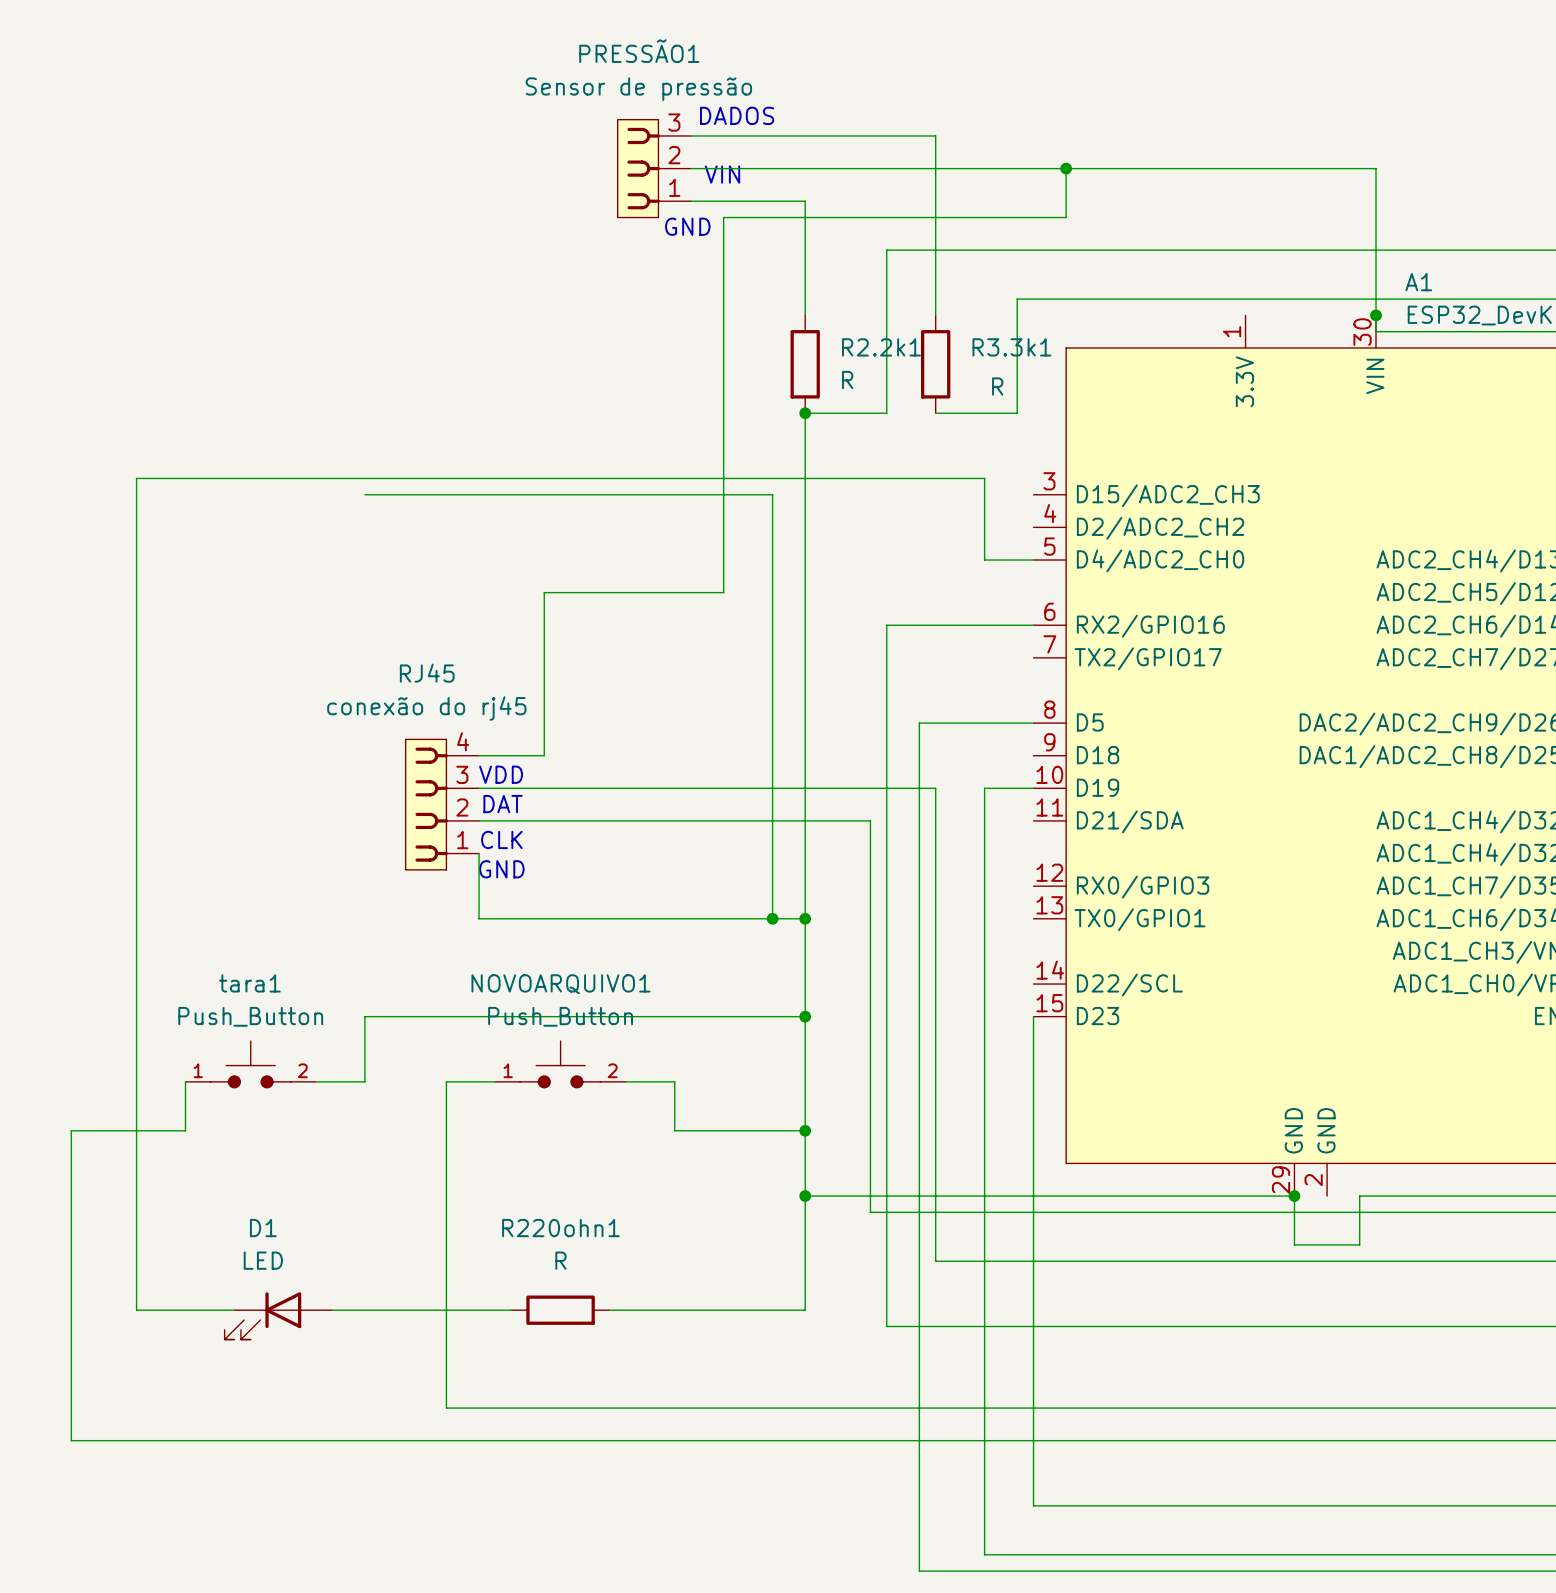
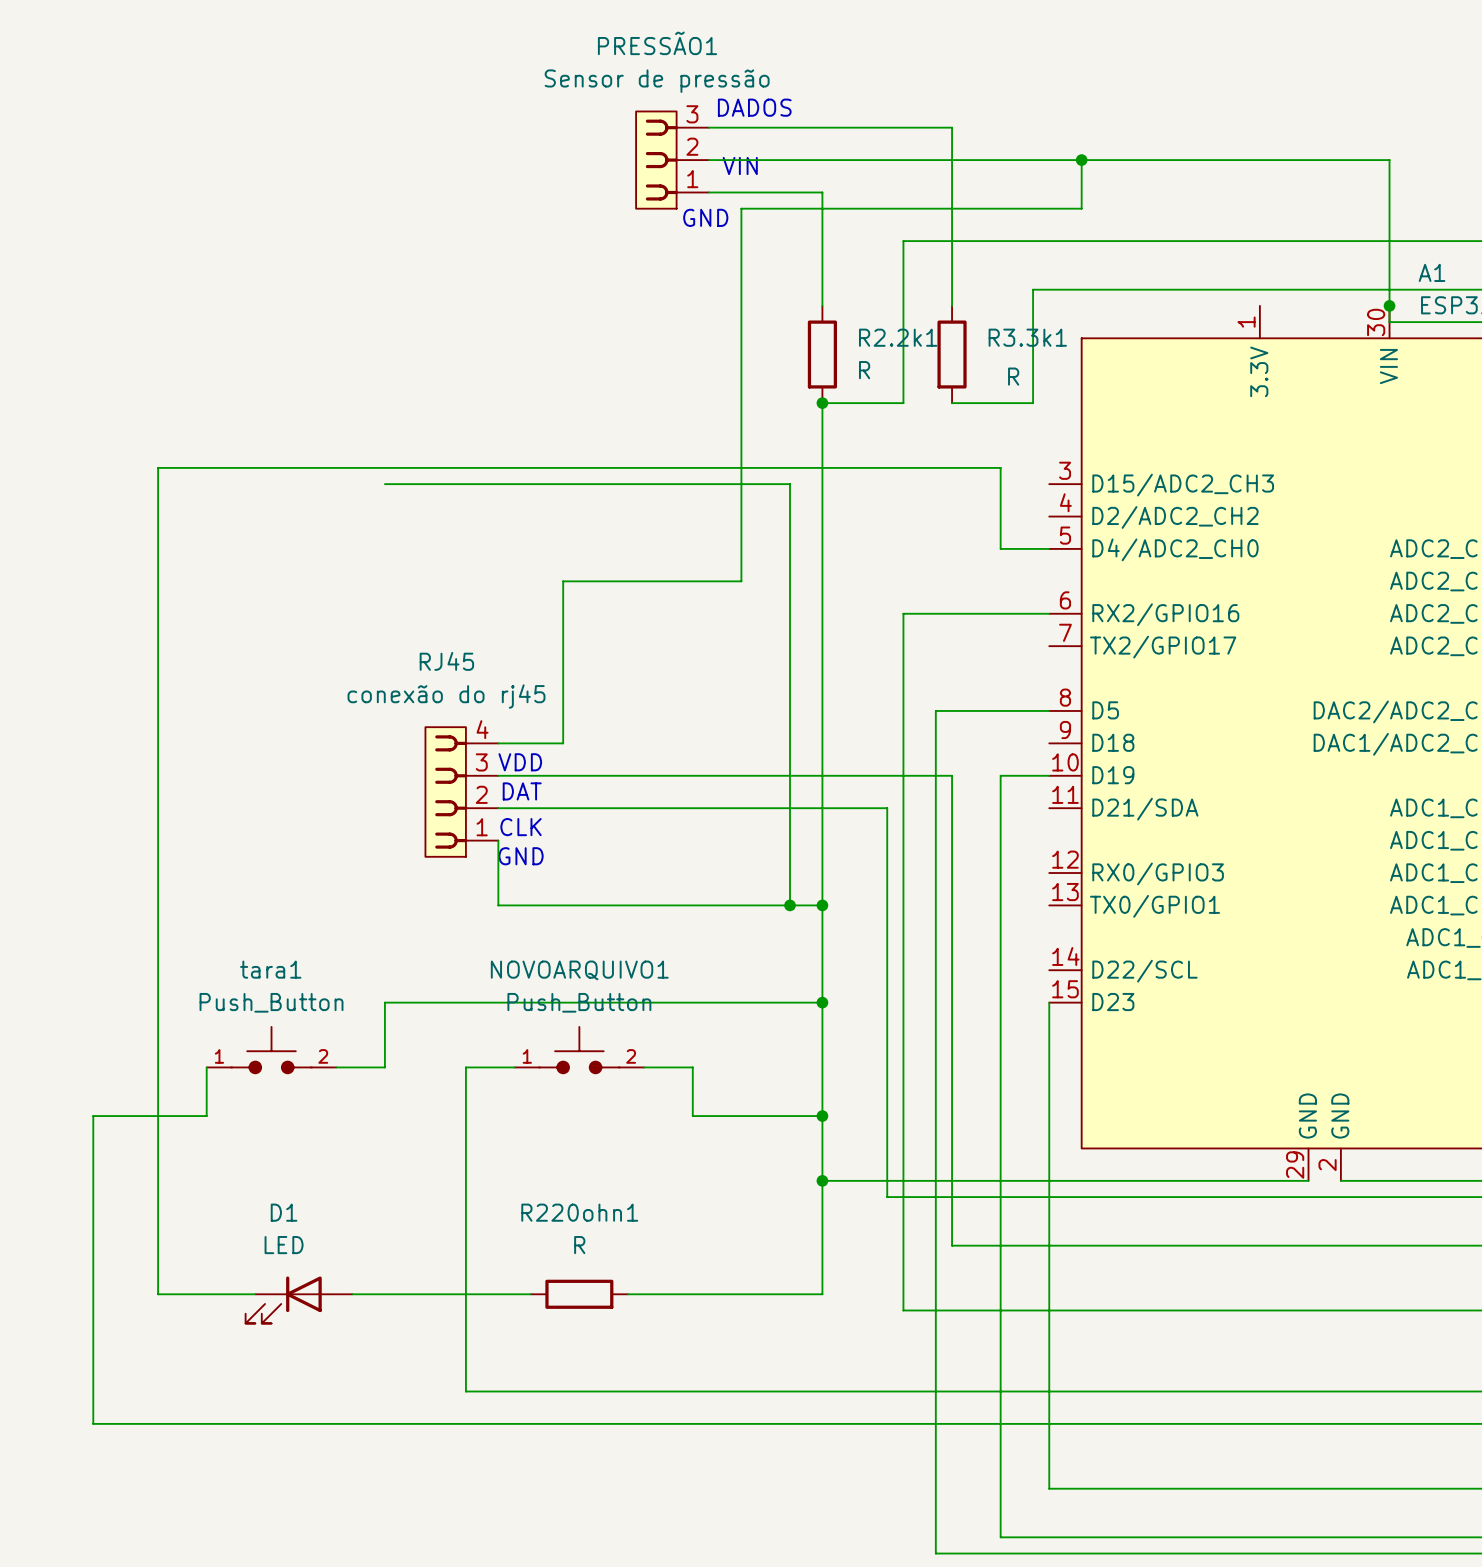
wire: (1294, 1196) (1294, 1244) (1359, 1244) (1359, 1196) -> (1340, 1180) (1373, 1180)
junction: (1294, 1196) -> none

